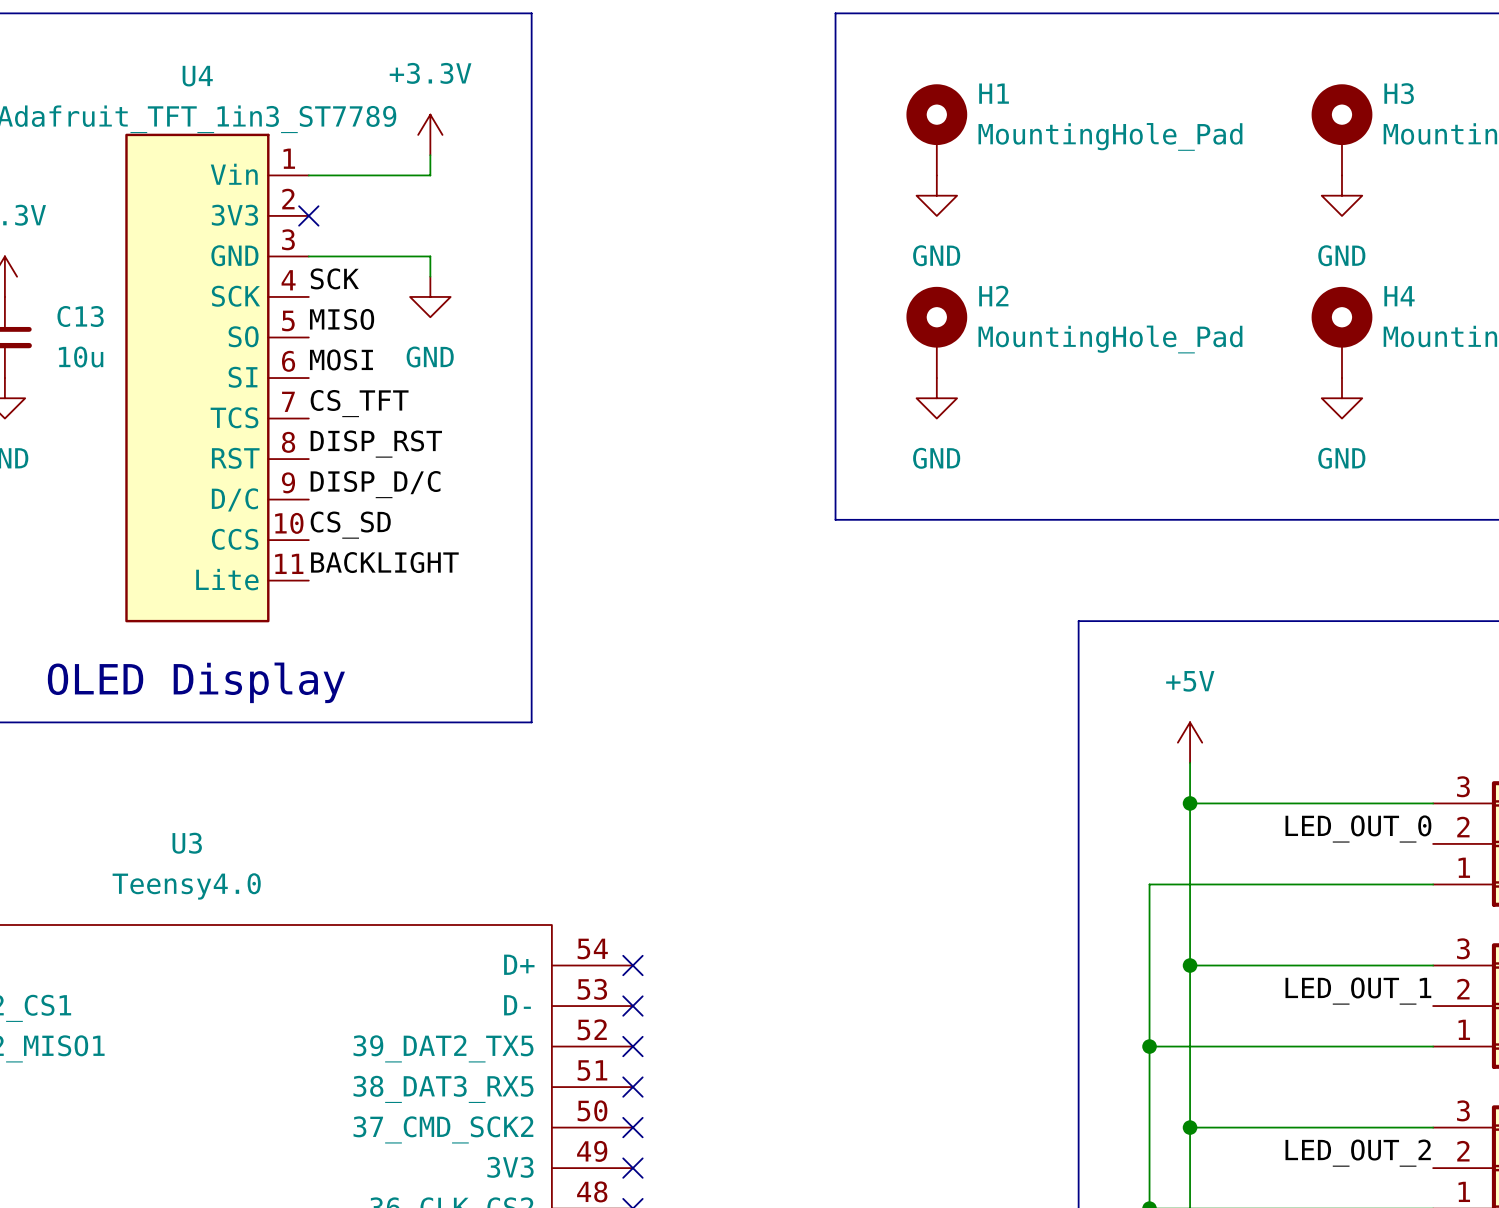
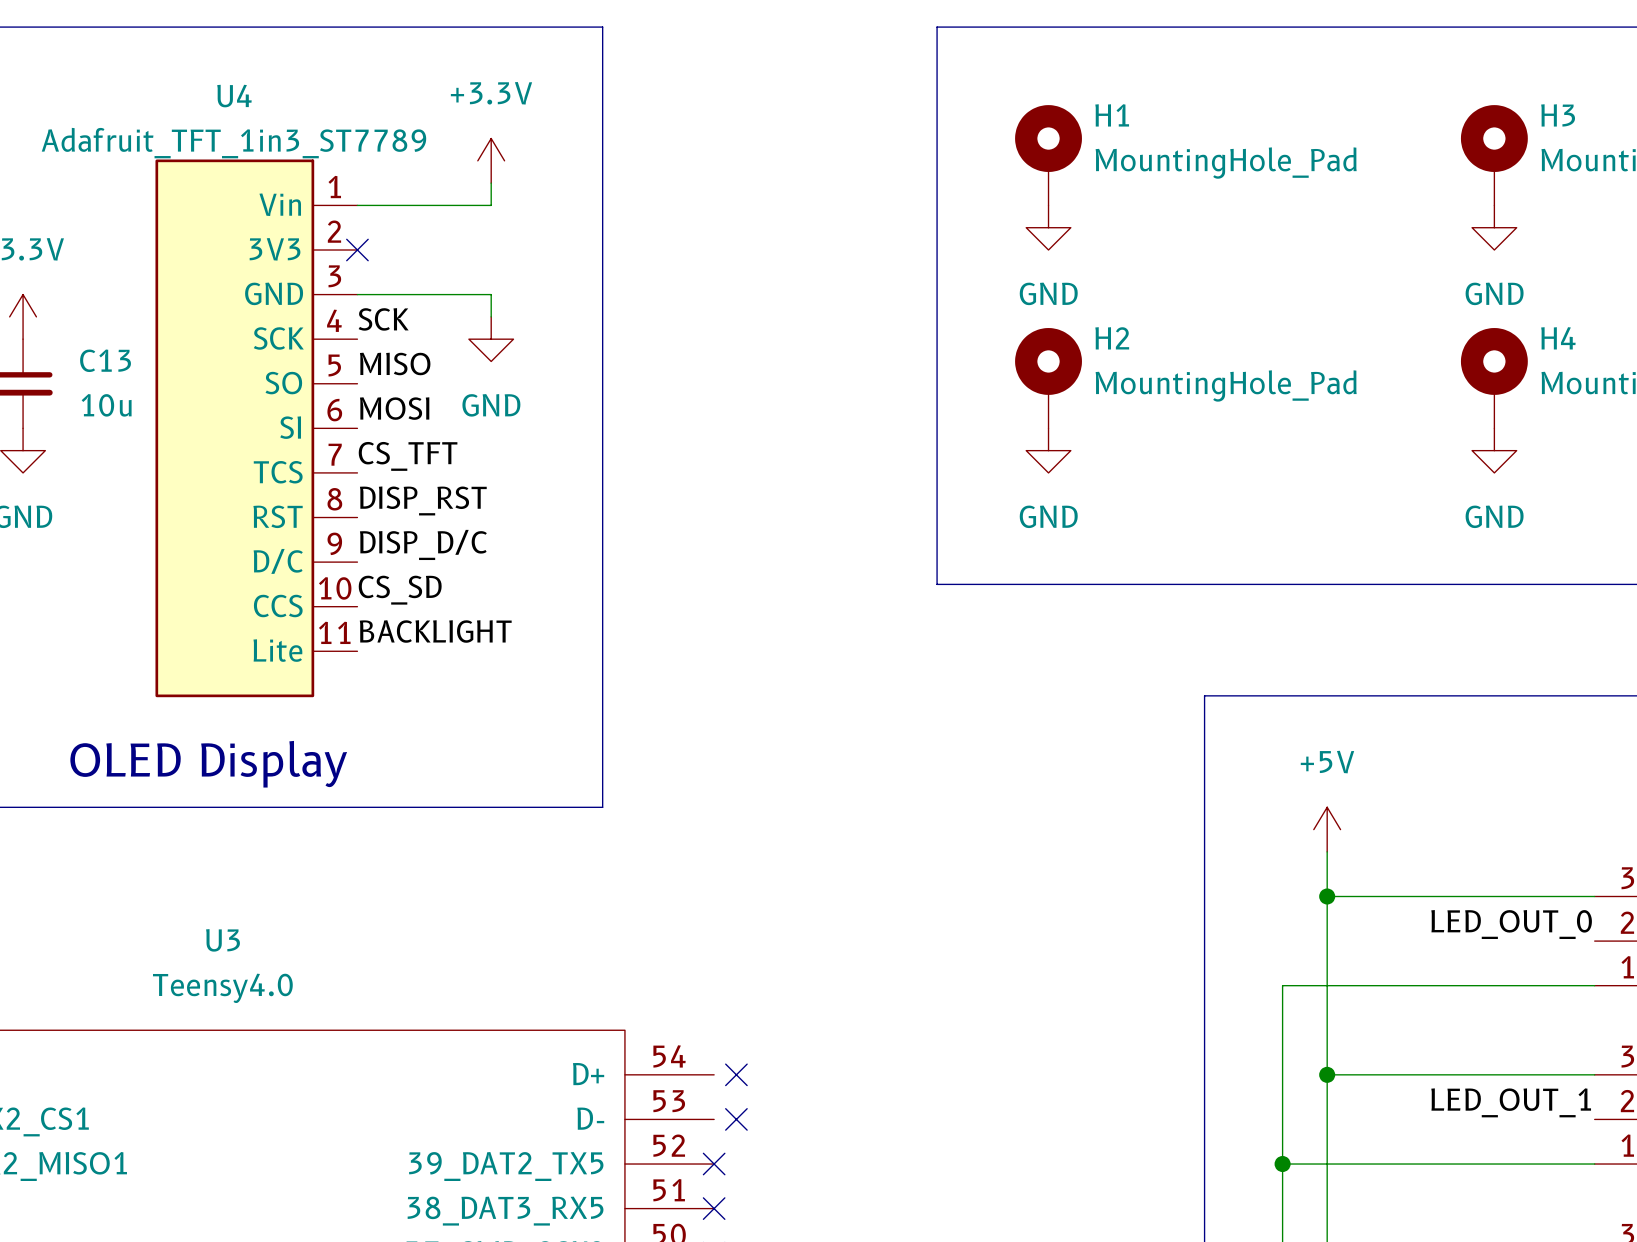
no-connect mark position: (632, 965) -> (736, 1074)
no-connect mark position: (632, 1006) -> (736, 1119)

